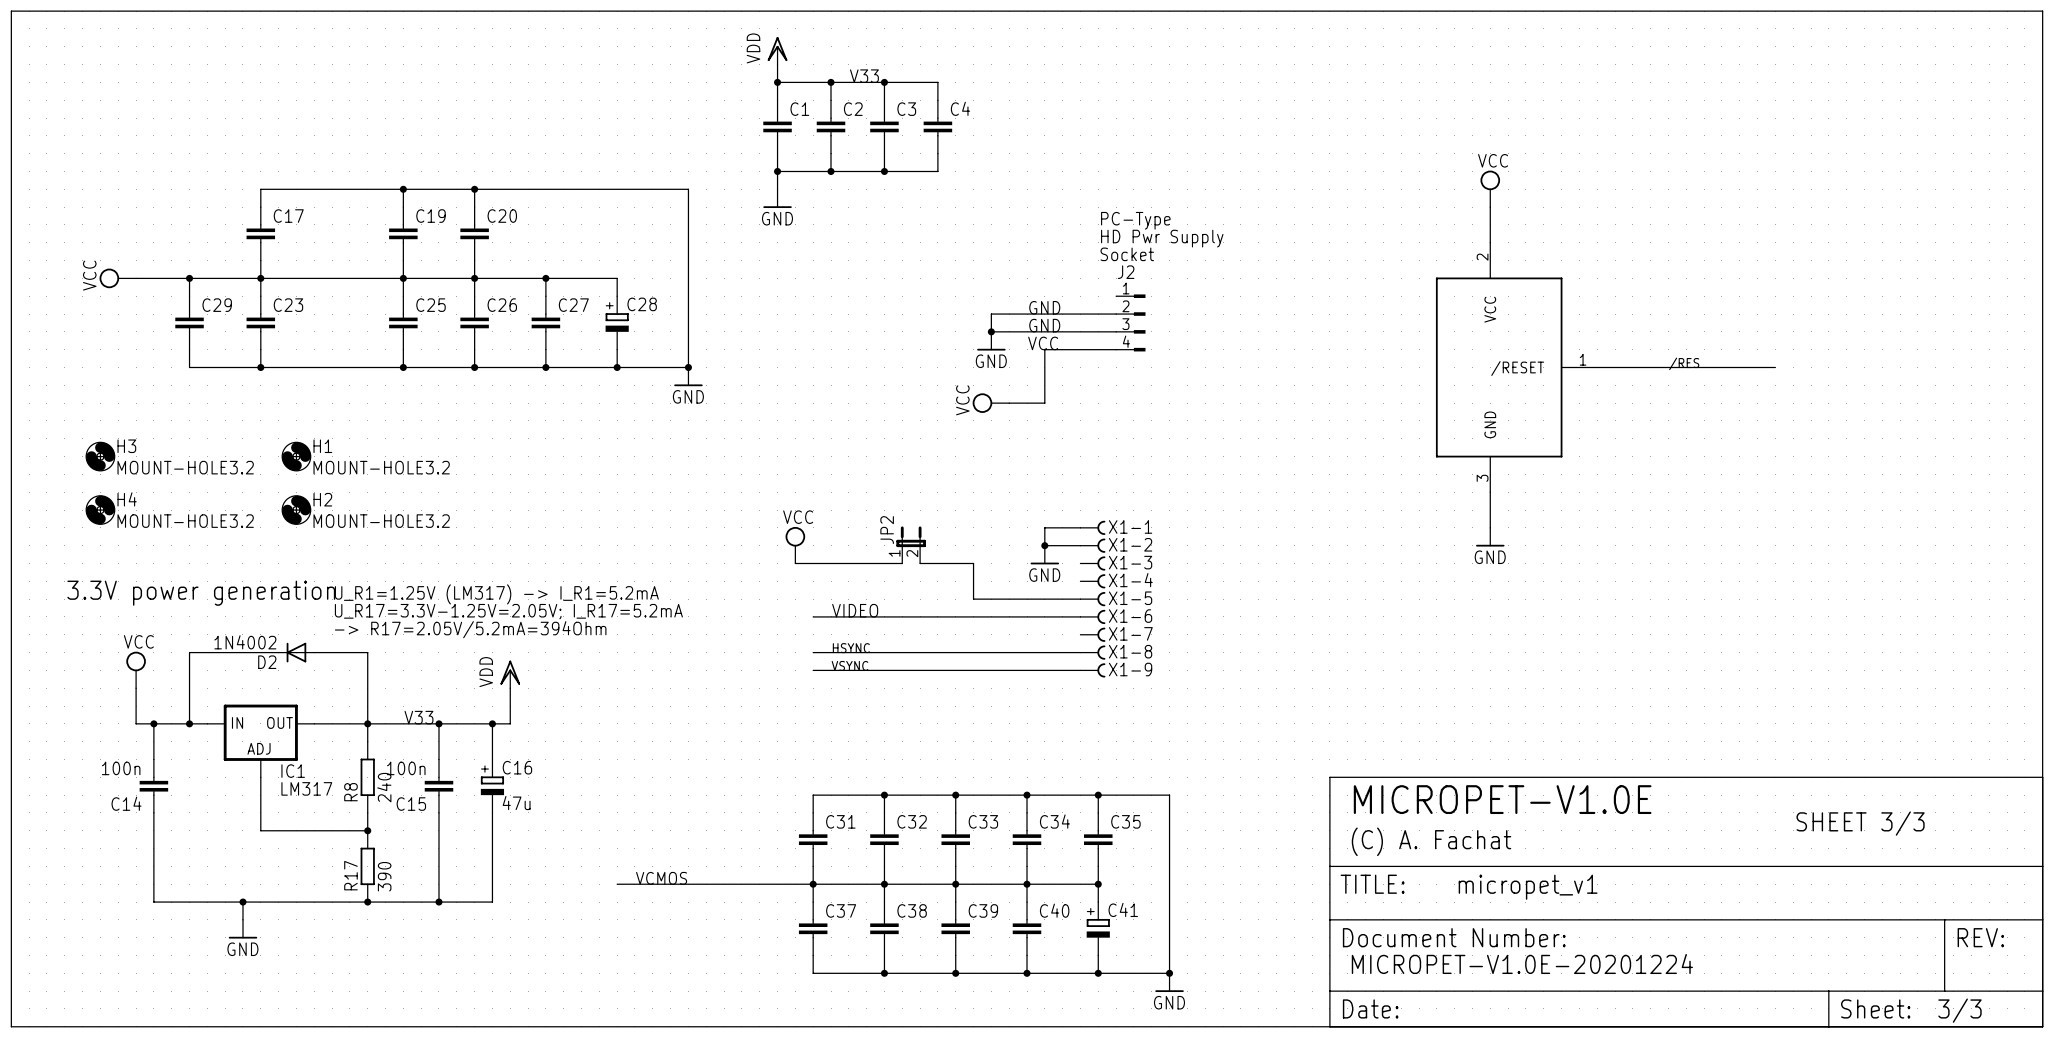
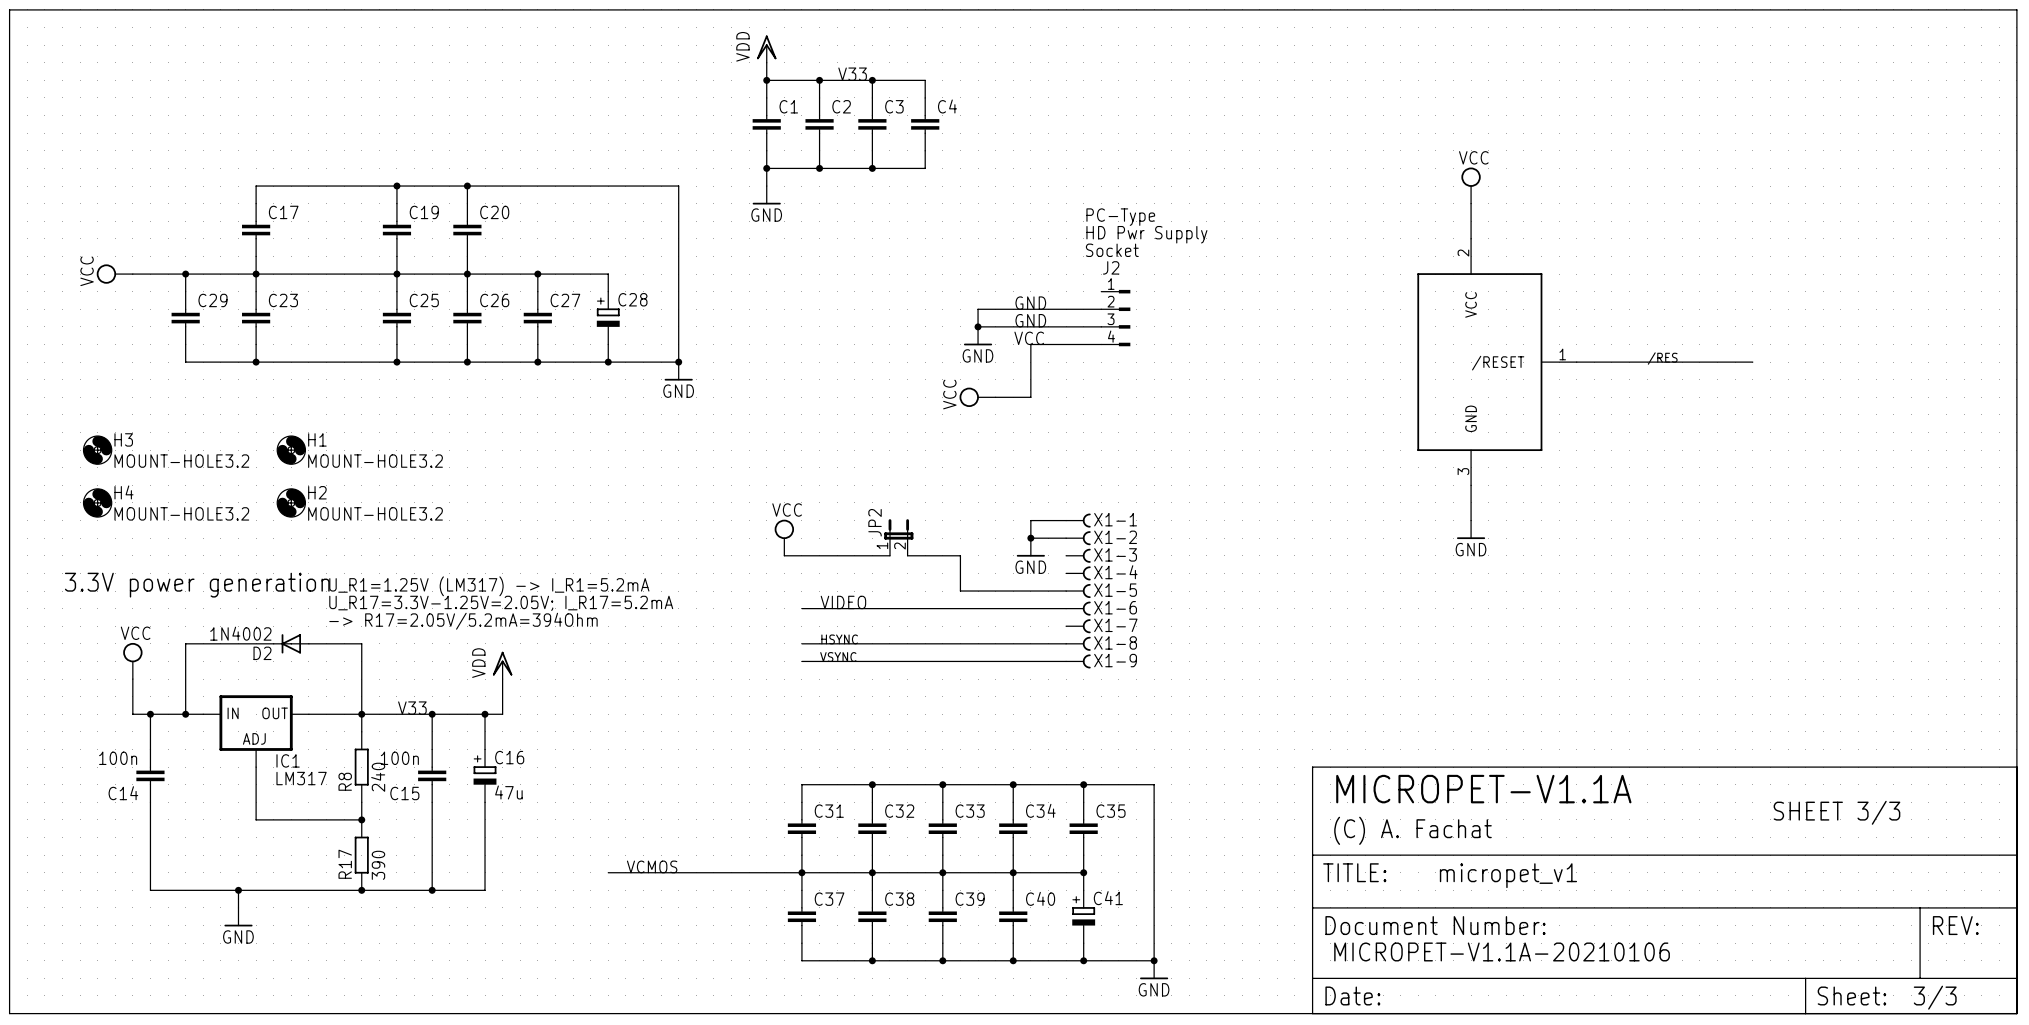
text: MICROPET-V1.0E (1502, 799) -> MICROPET-V1.1A (1483, 789)
text: MICROPET-V1.0E-20201224 (1522, 963) -> MICROPET-V1.1A-20210106 (1502, 951)

